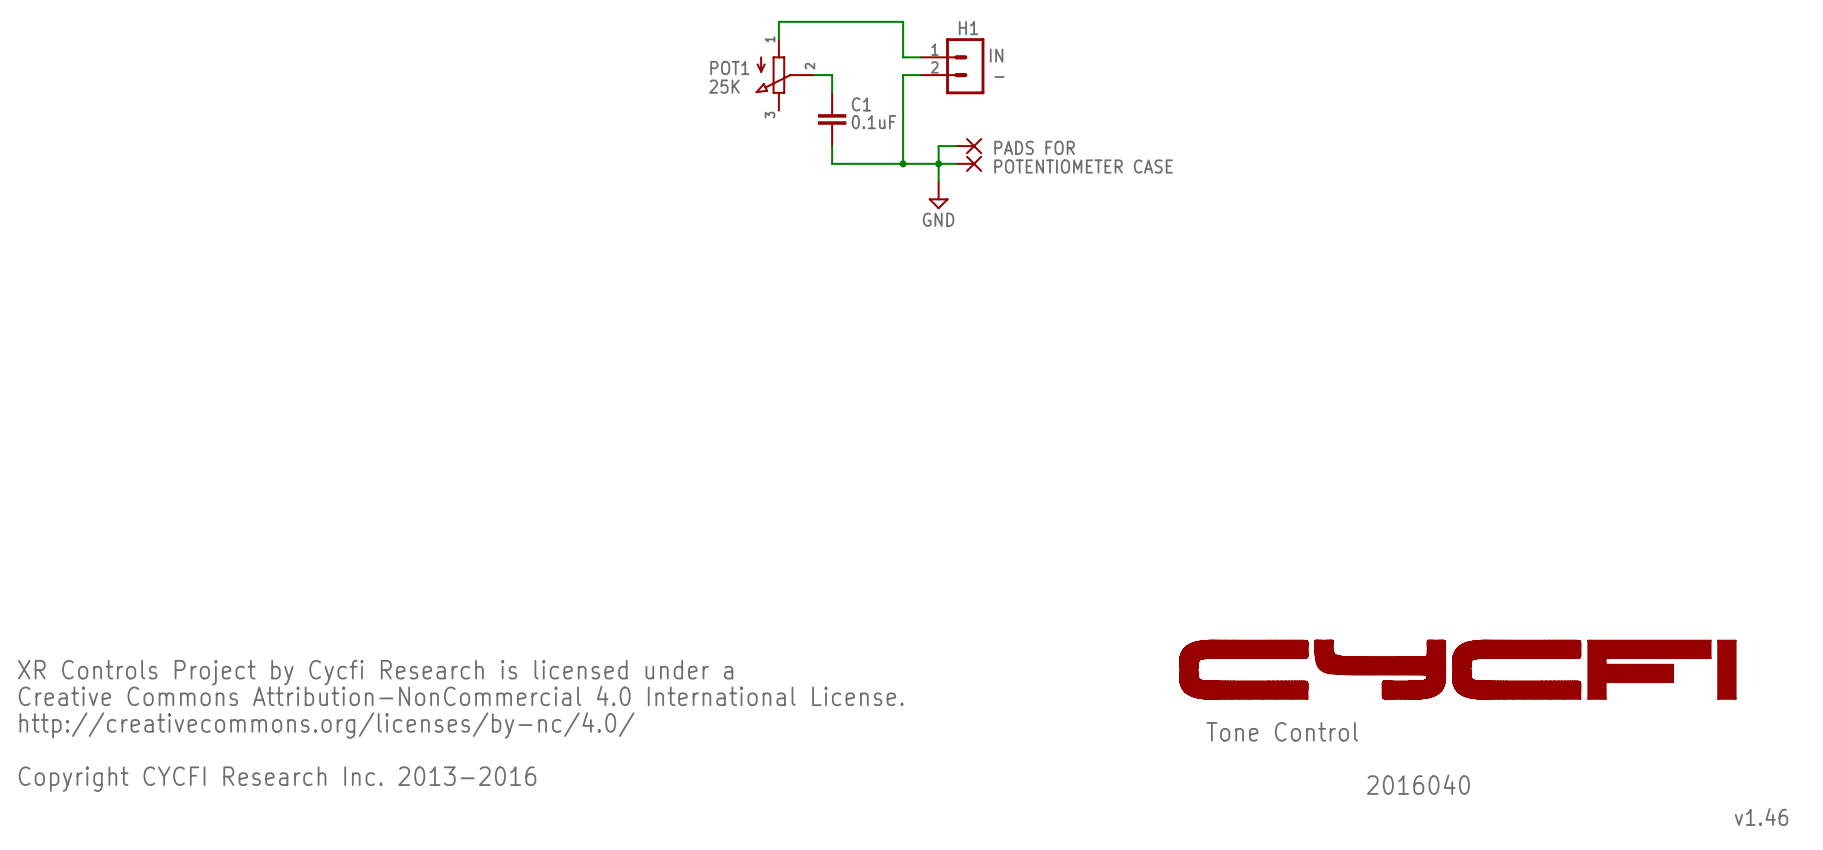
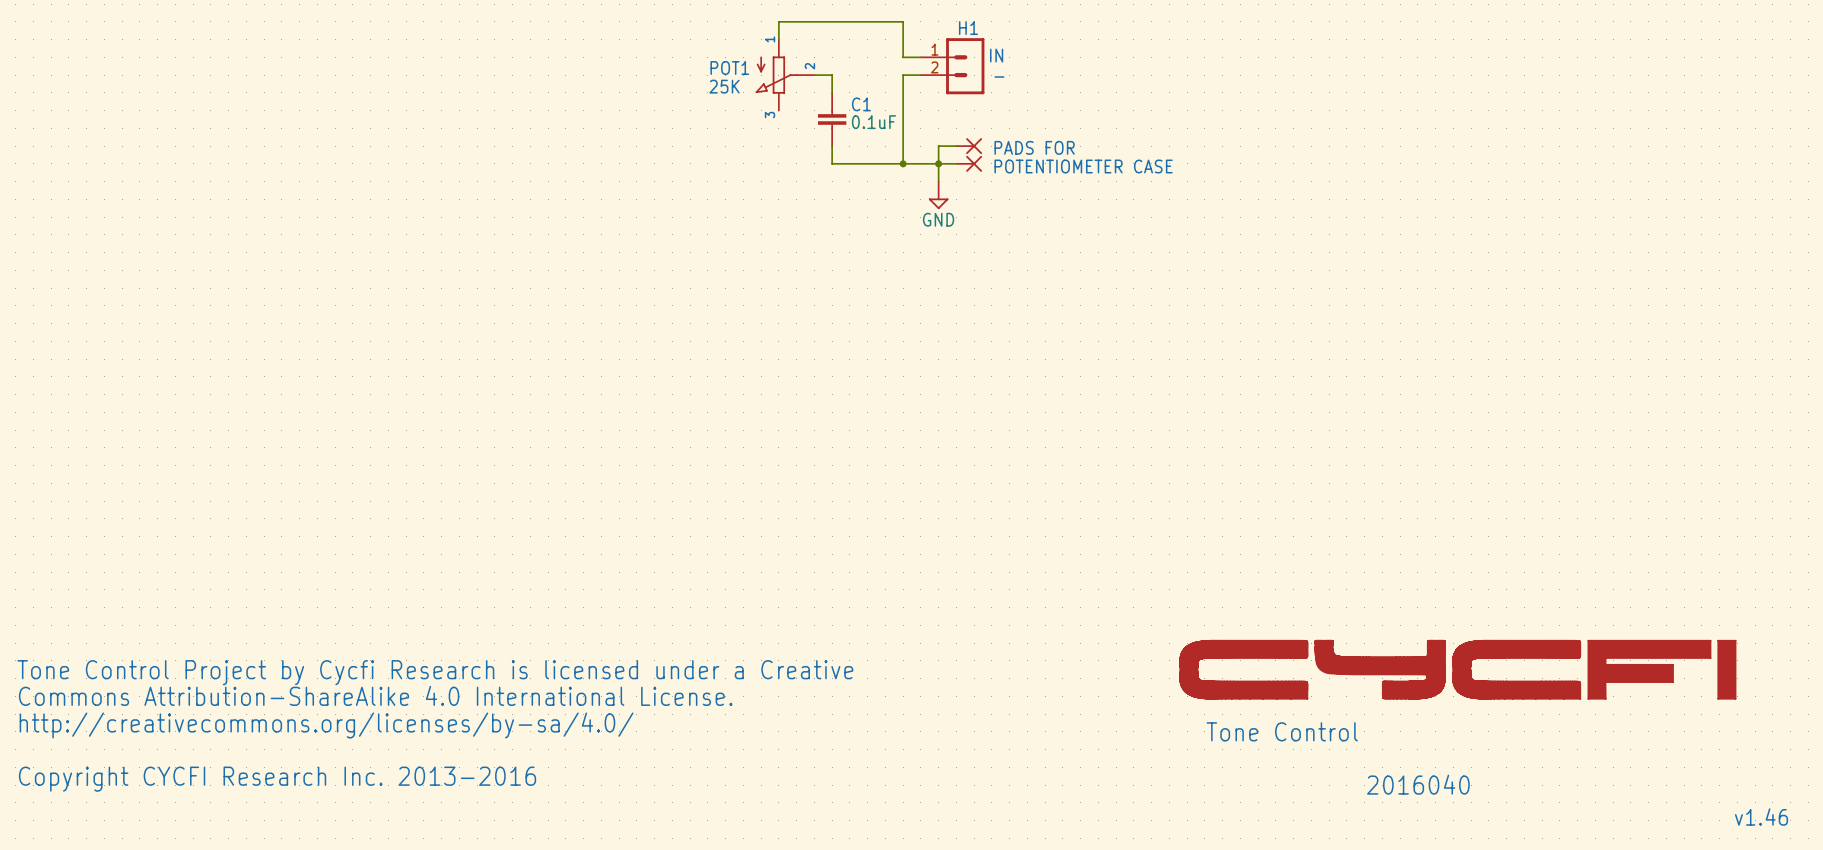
text: XR Controls Project by Cycfi Research is licensed under a (375, 672) -> Tone Control Project by Cycfi Research is licensed under a Creative (435, 672)
text: Creative Commons Attribution-NonCommercial 4.0 International License. (461, 695) -> Commons Attribution-ShareAlike 4.0 International License. (375, 695)
text: http://creativecommons.org/licenses/by-nc/4.0/ (326, 725) -> http://creativecommons.org/licenses/by-sa/4.0/ (326, 725)

